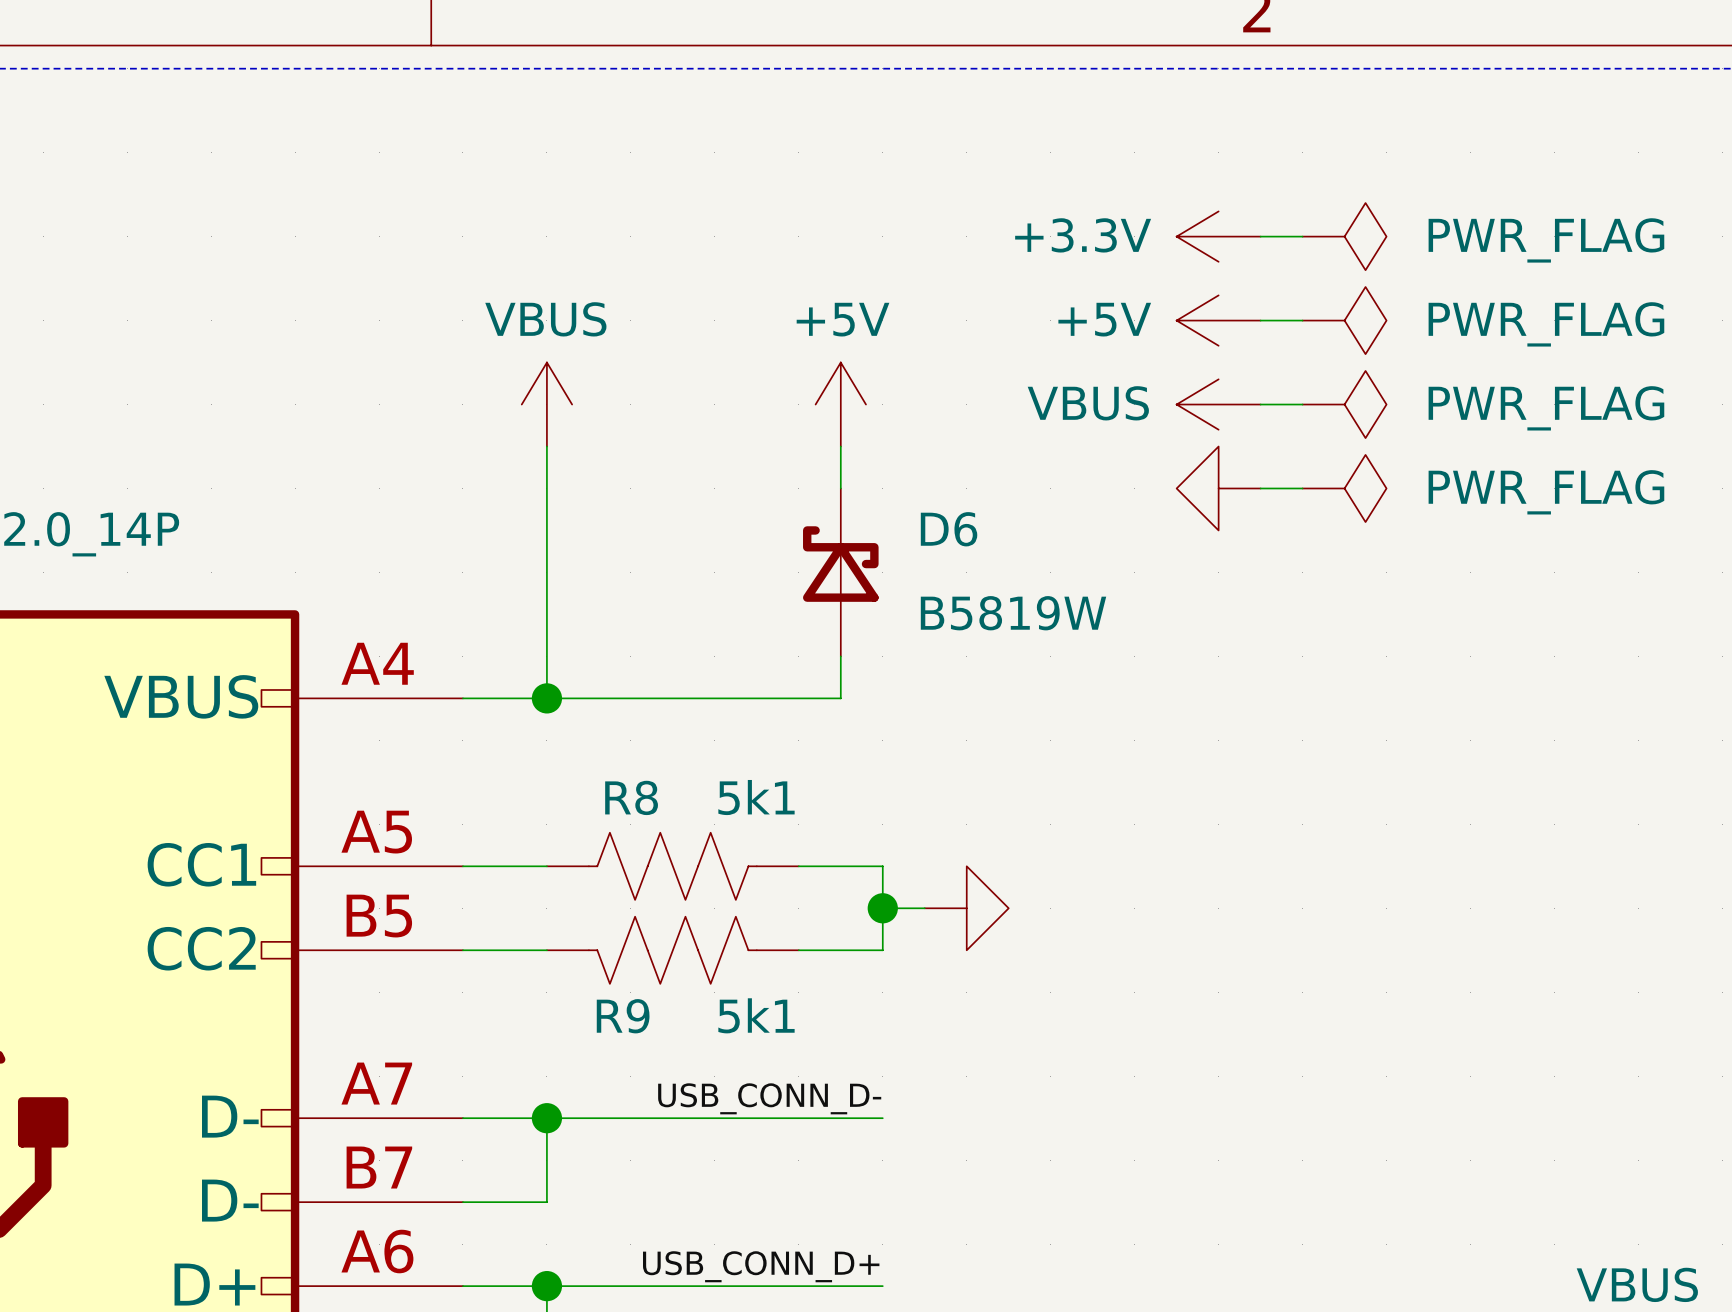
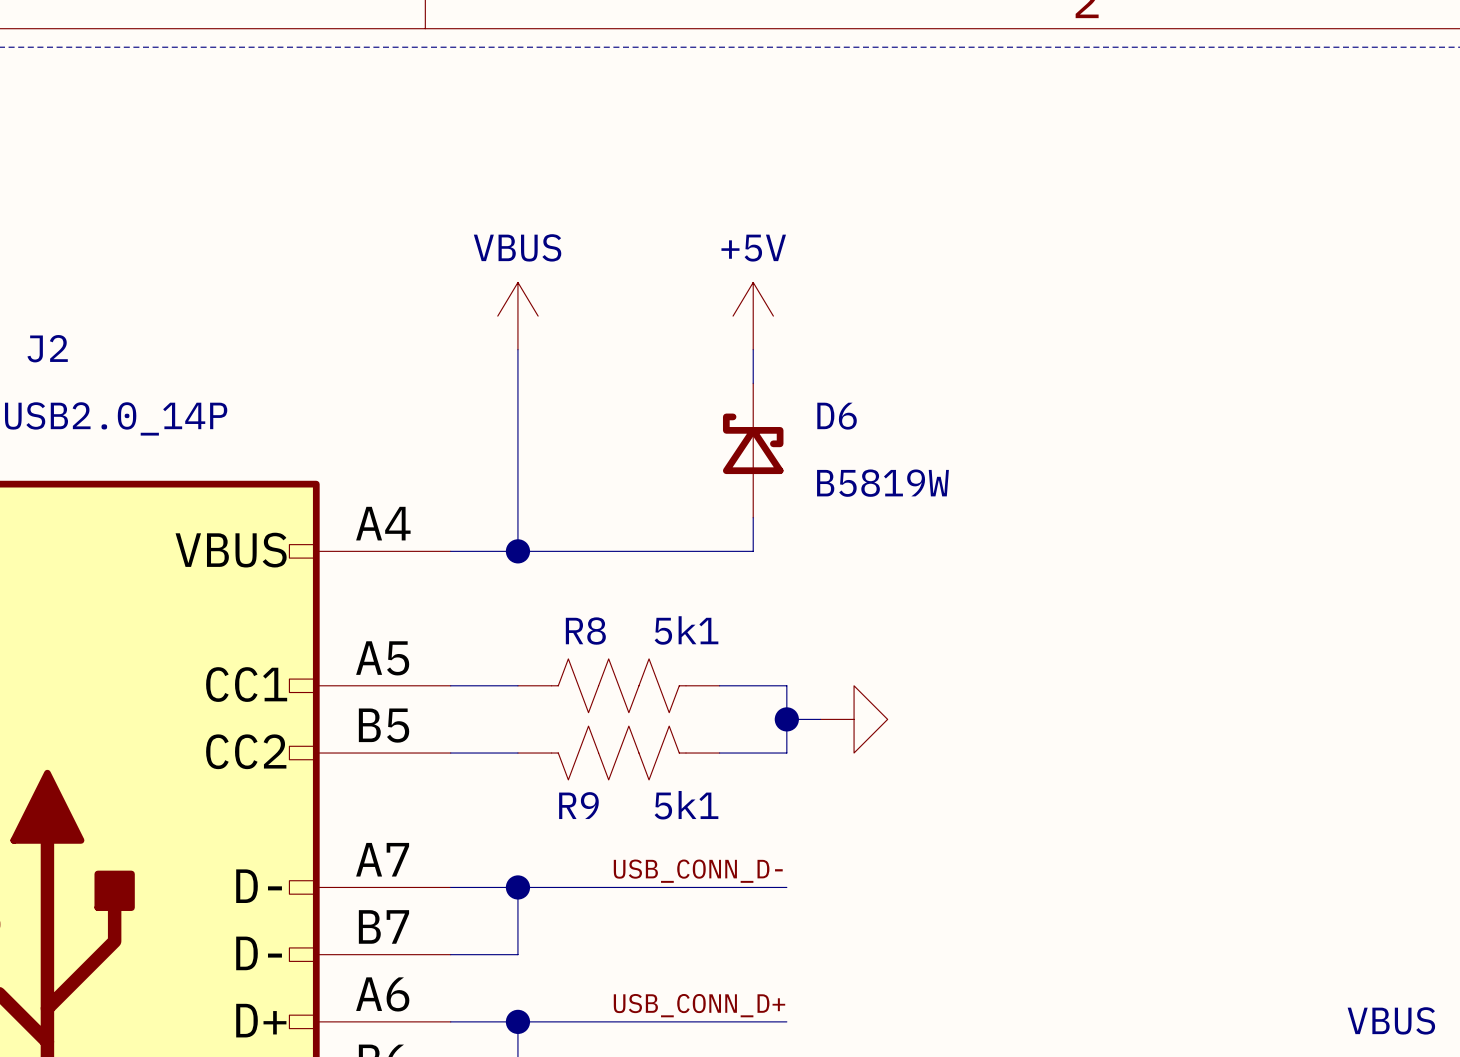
power symbol: +3.3V (1218, 236) -> none
wire: (1260, 236) (1302, 236) -> none
power symbol: PWR_FLAG (1344, 236) -> none
power symbol: +5V (1218, 320) -> none
wire: (1260, 320) (1302, 320) -> none
power symbol: PWR_FLAG (1344, 320) -> none
power symbol: VBUS (1218, 404) -> none
wire: (1260, 404) (1302, 404) -> none
power symbol: PWR_FLAG (1344, 404) -> none
power symbol: (1218, 488) -> none
wire: (1260, 488) (1302, 488) -> none
power symbol: PWR_FLAG (1344, 488) -> none

